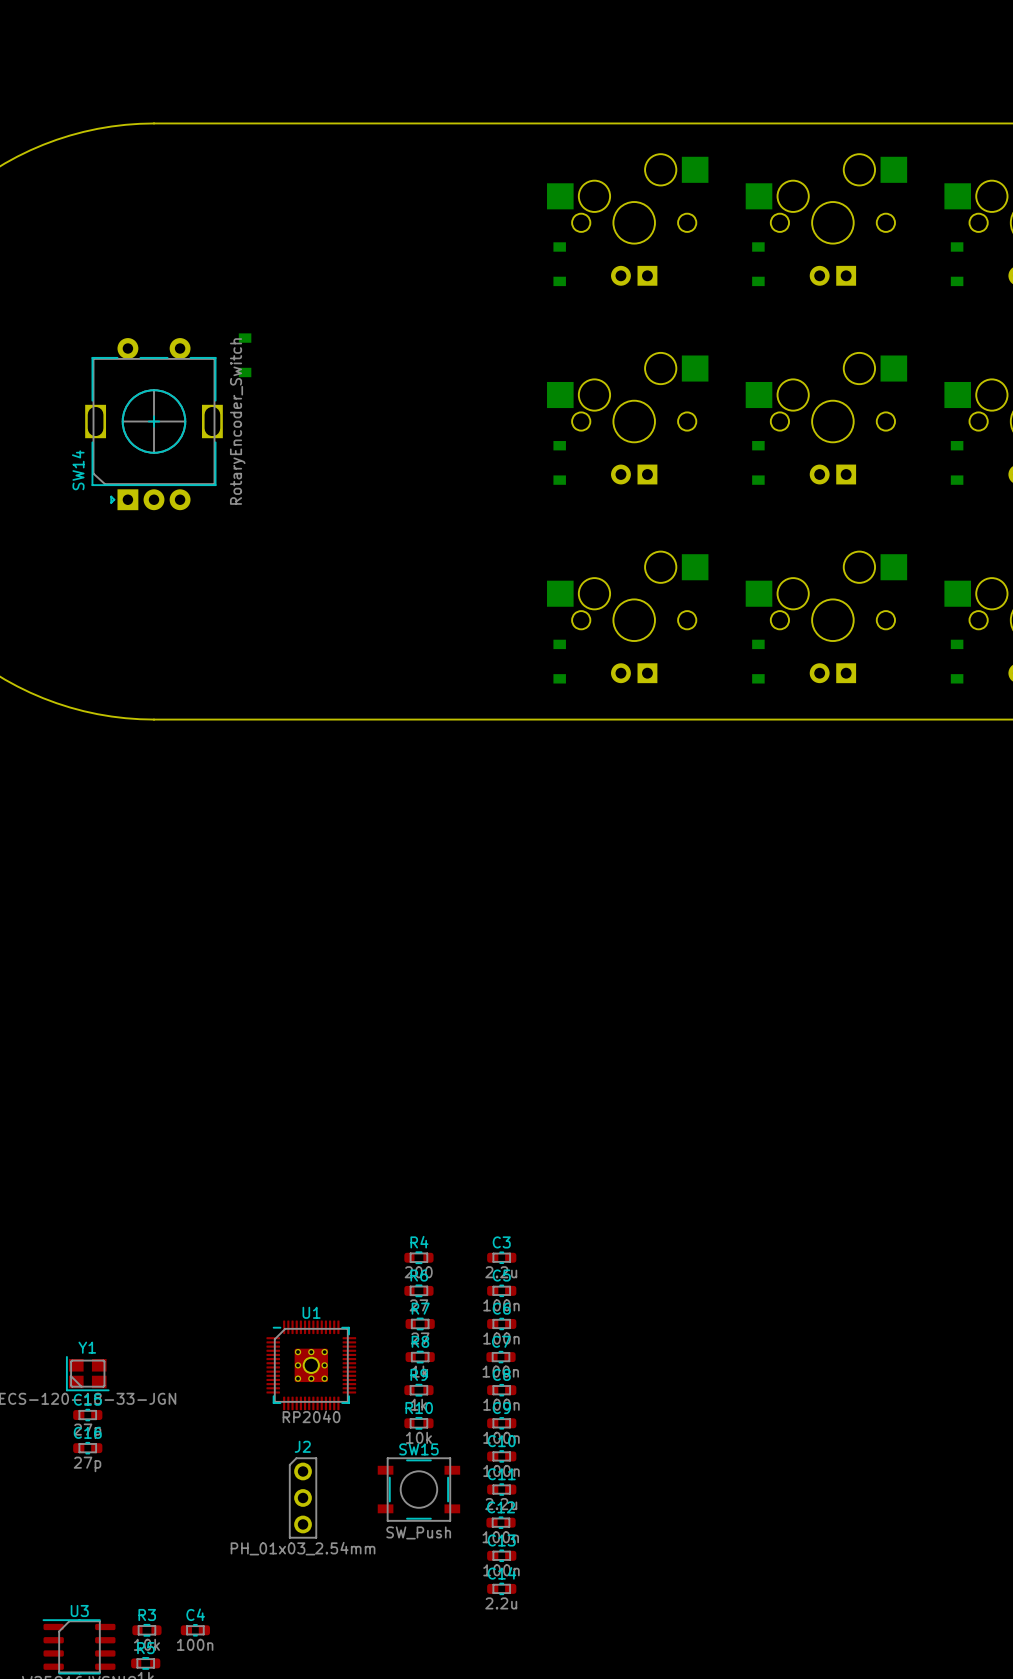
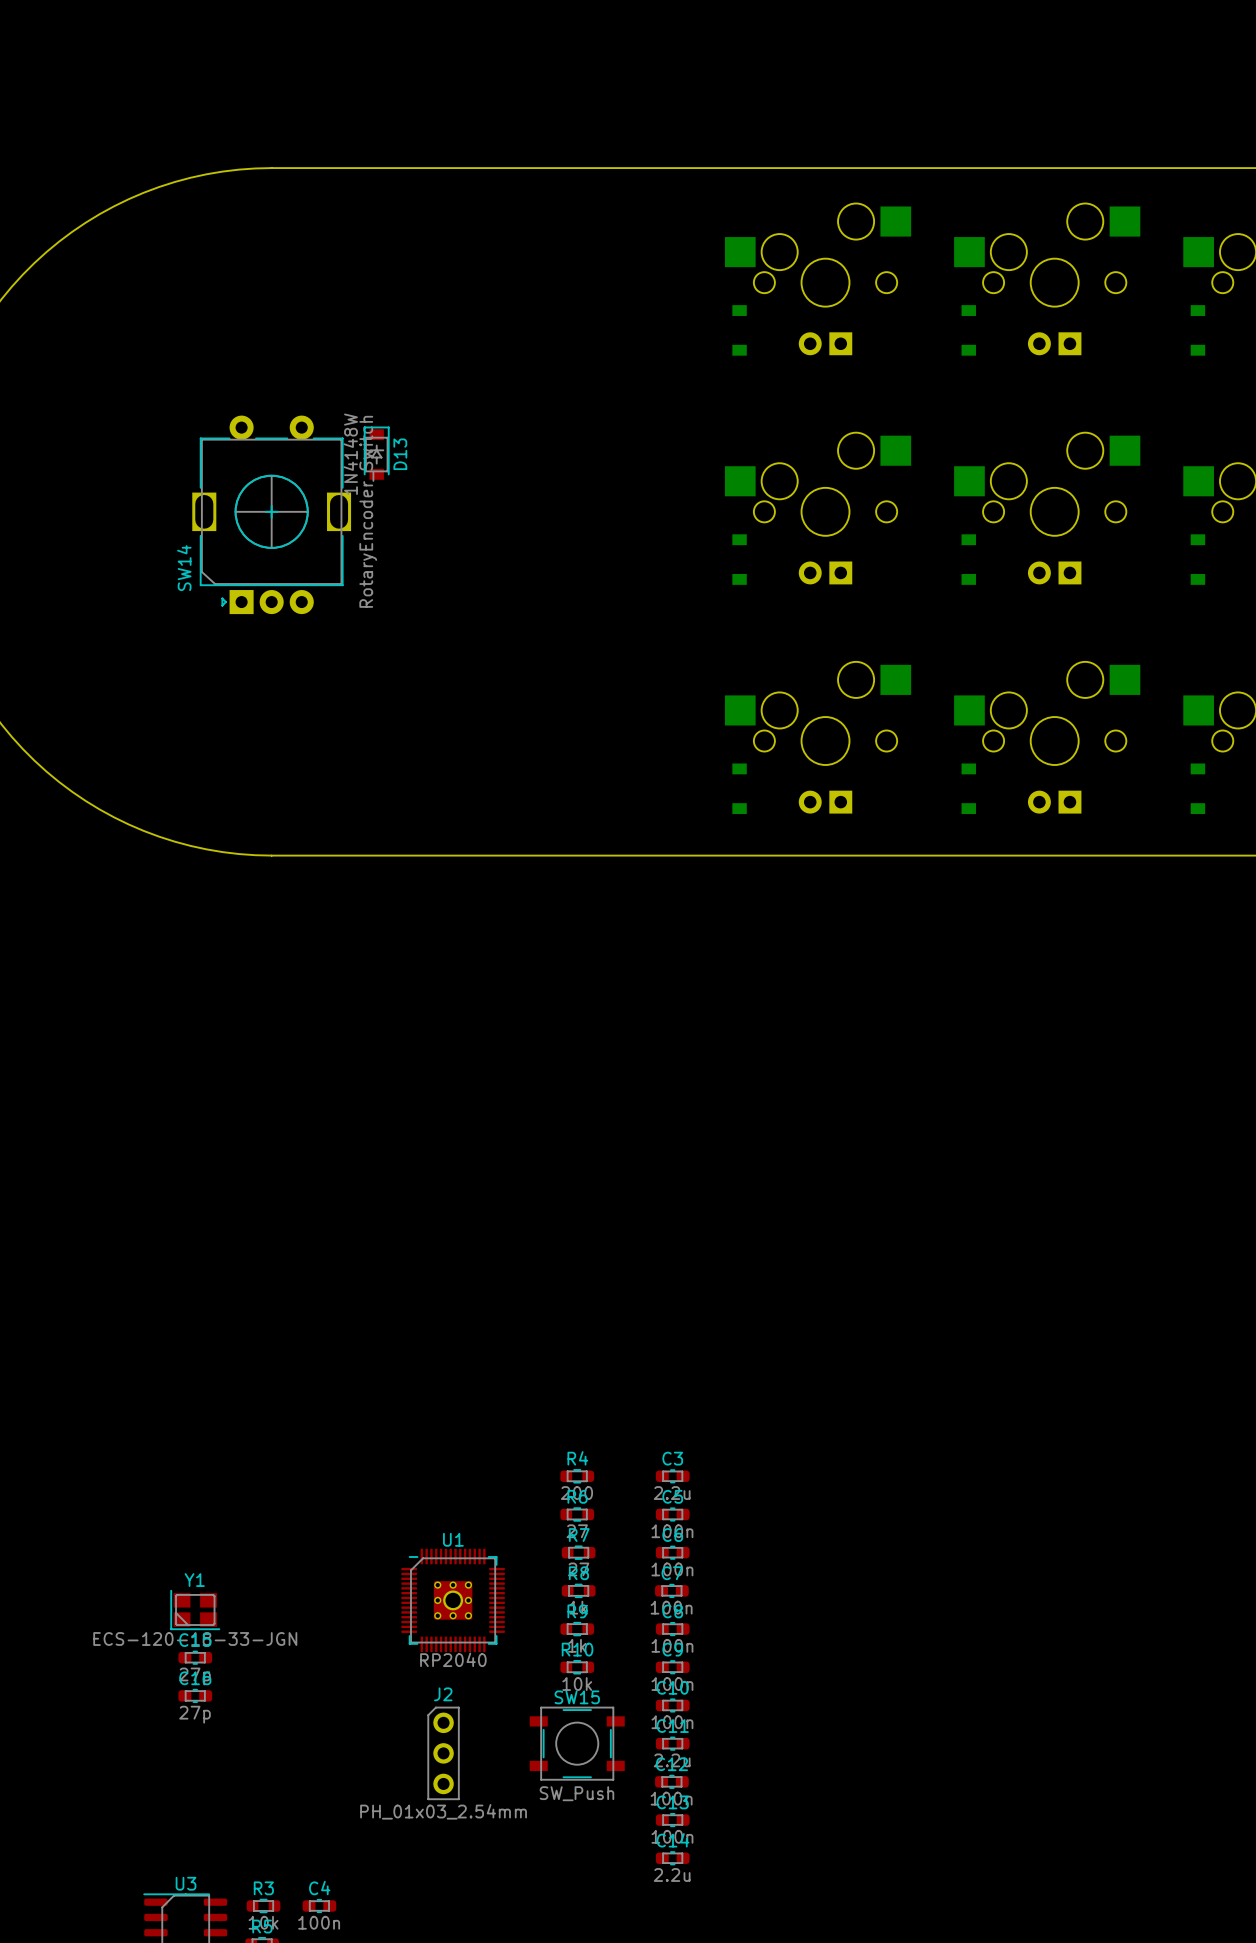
D13 side: bottom (245, 355) -> top (376, 453)

